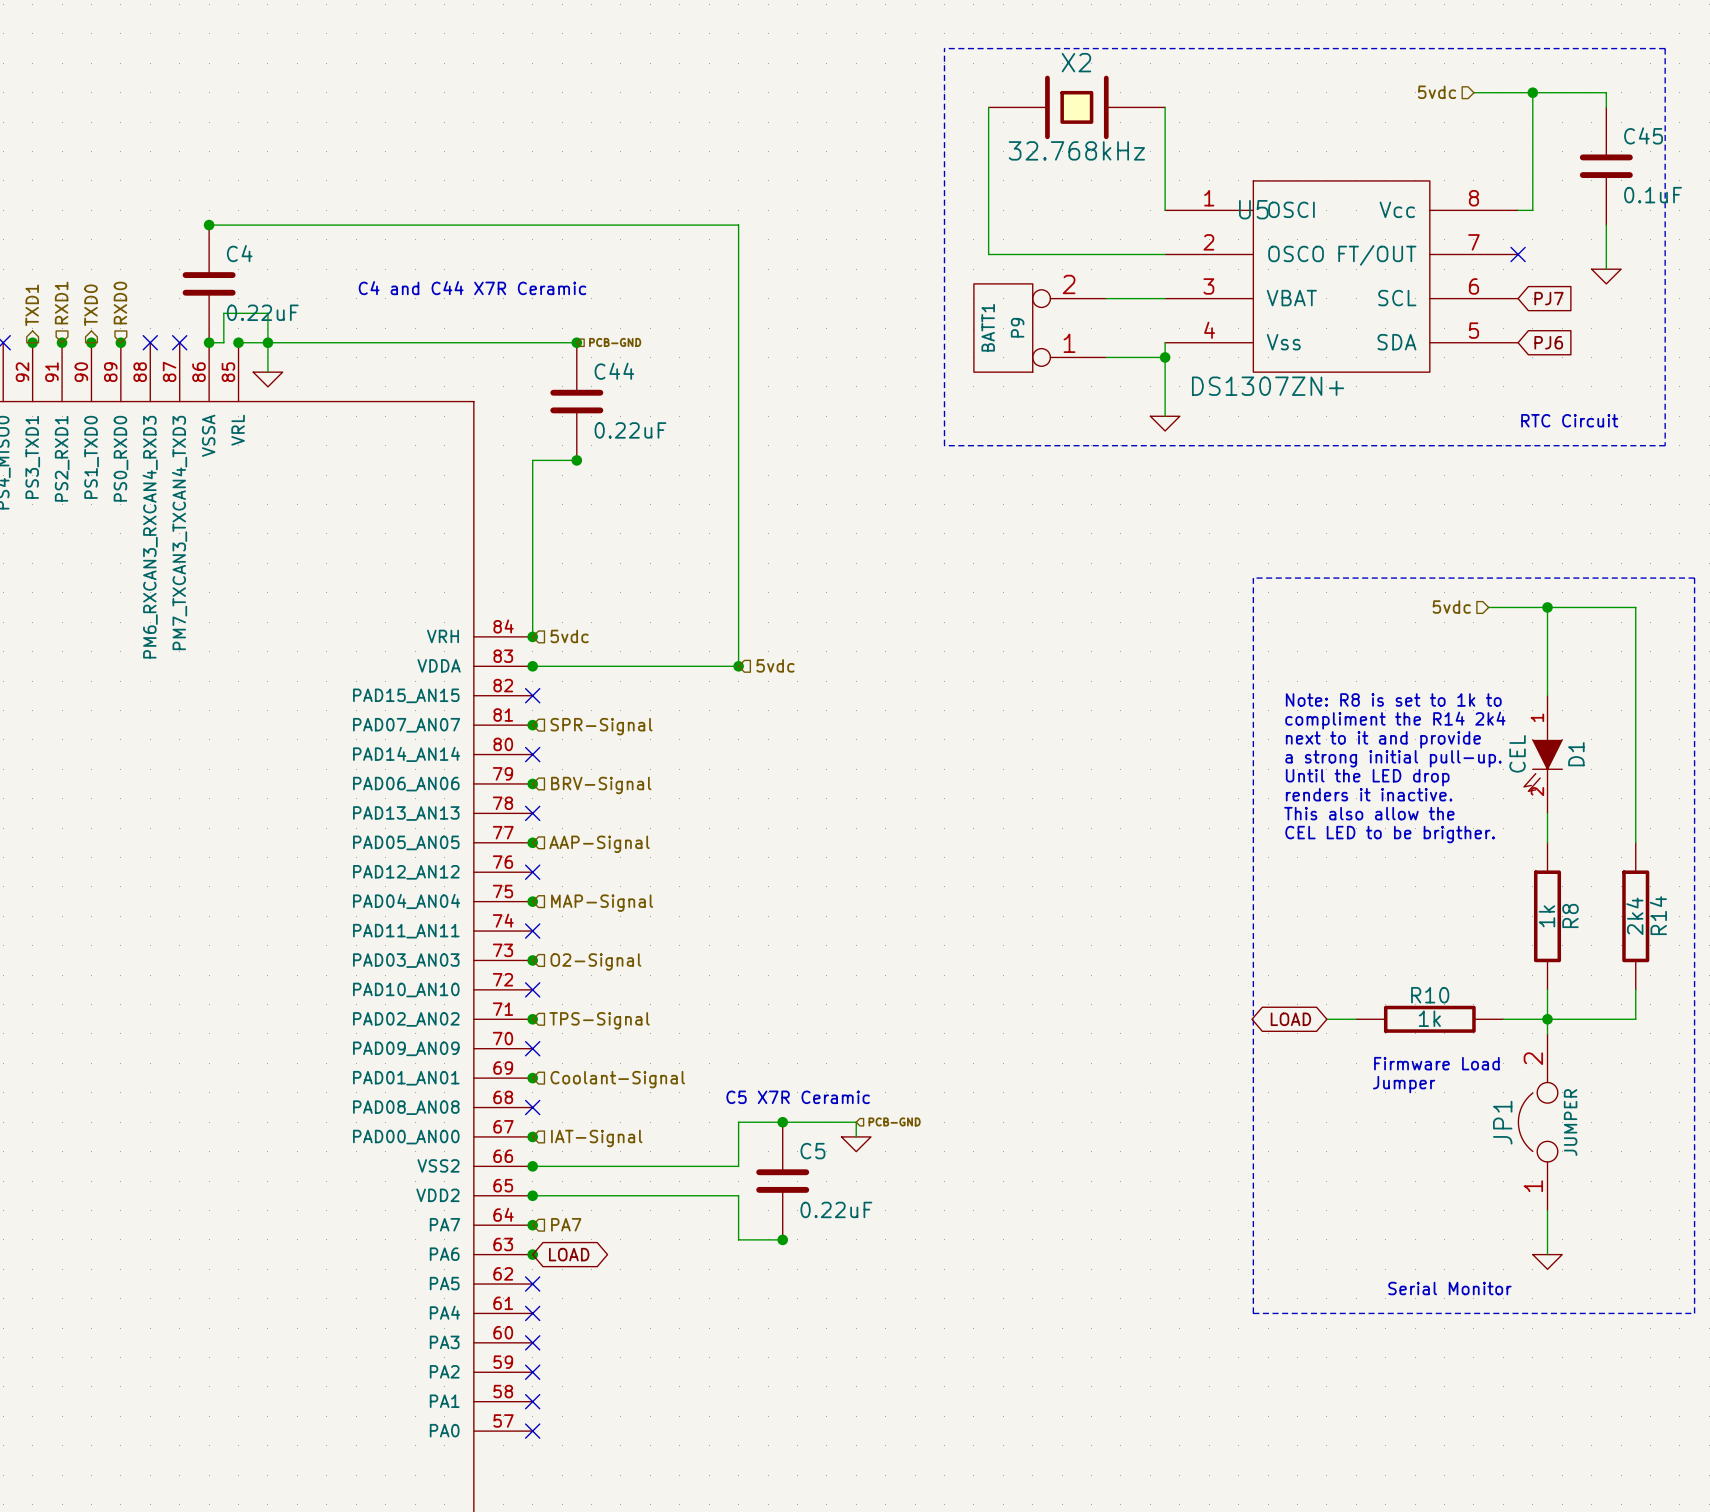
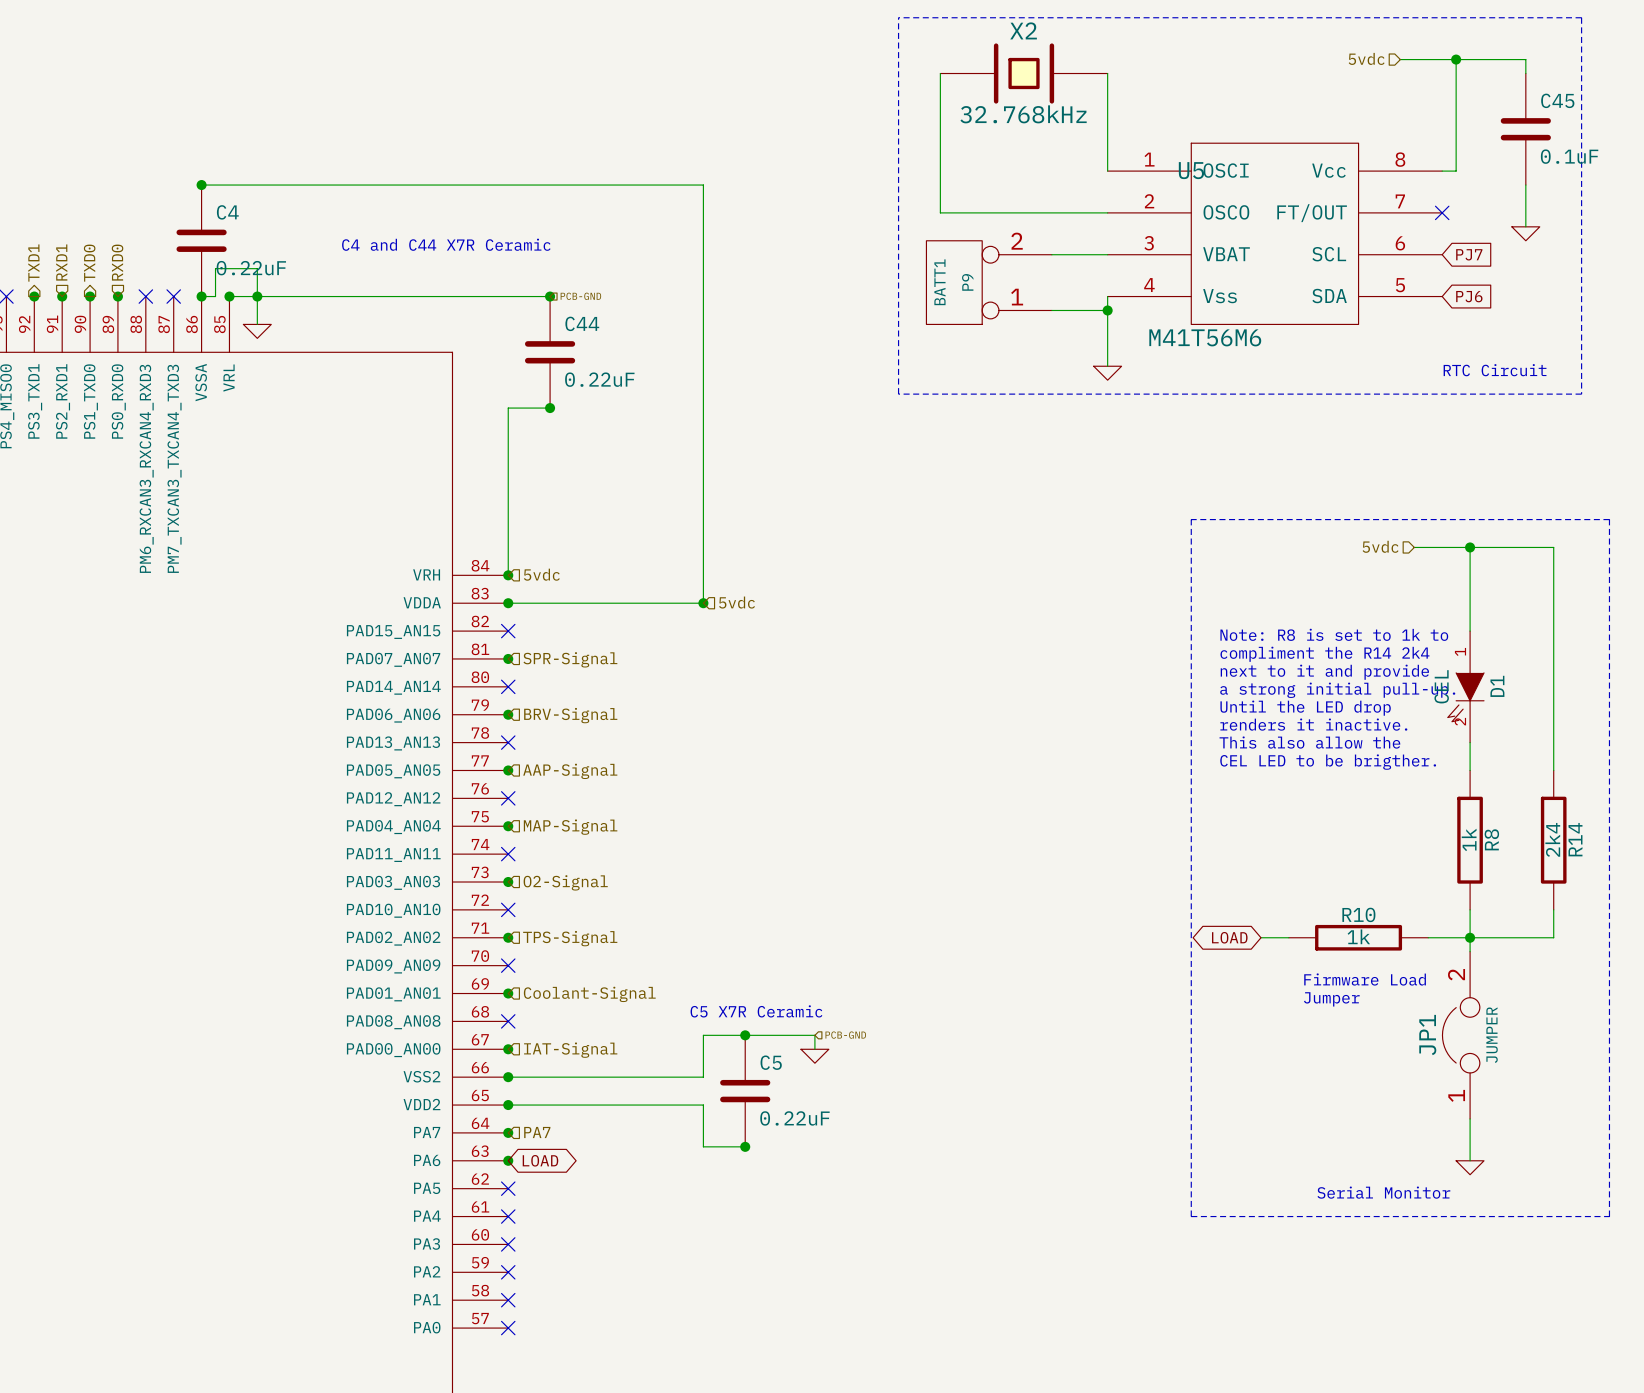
U5 value: DS1307ZN+ (1268, 386) -> M41T56M6 (1205, 337)

